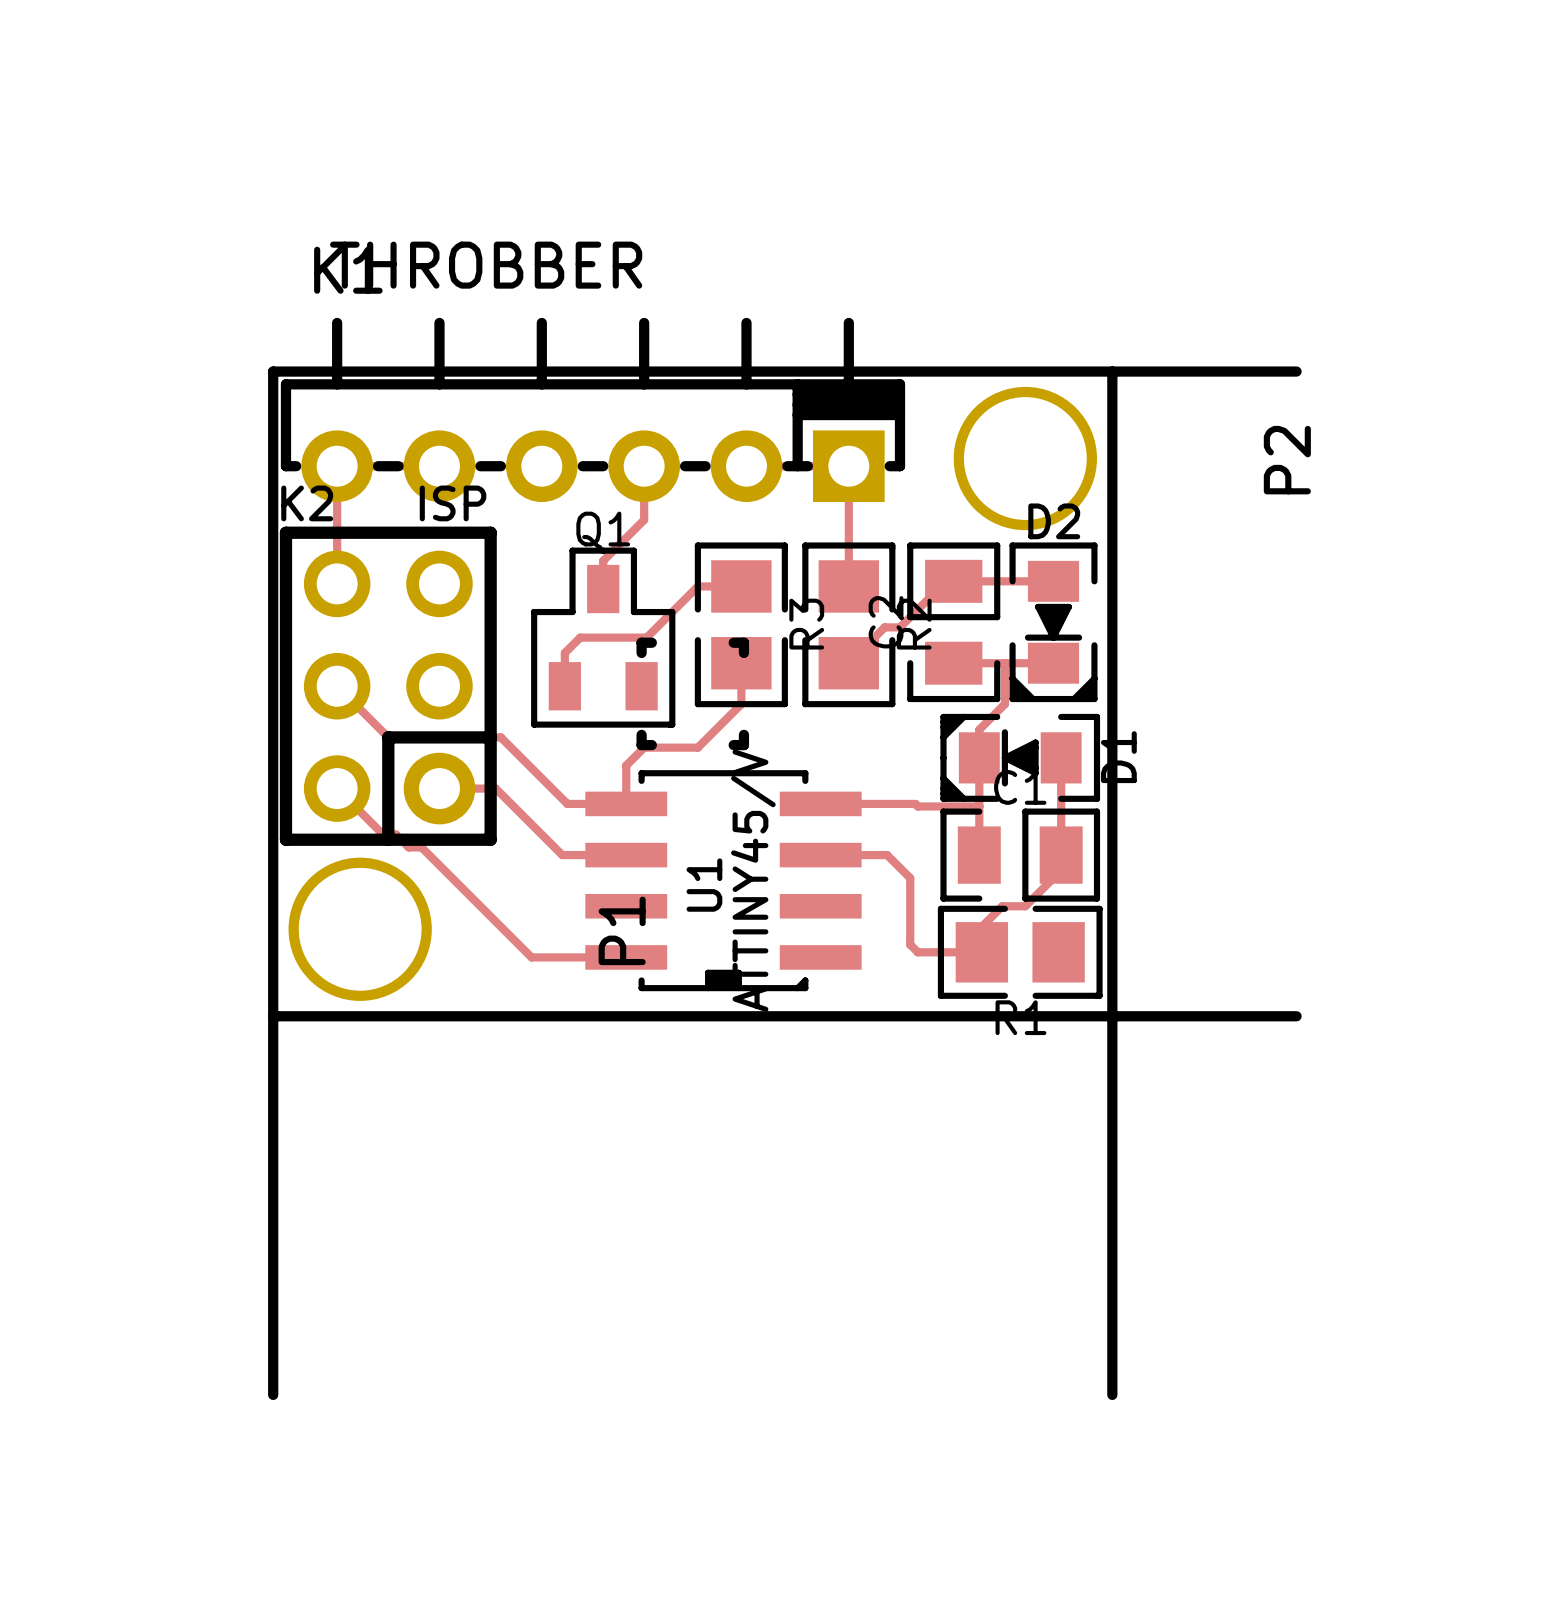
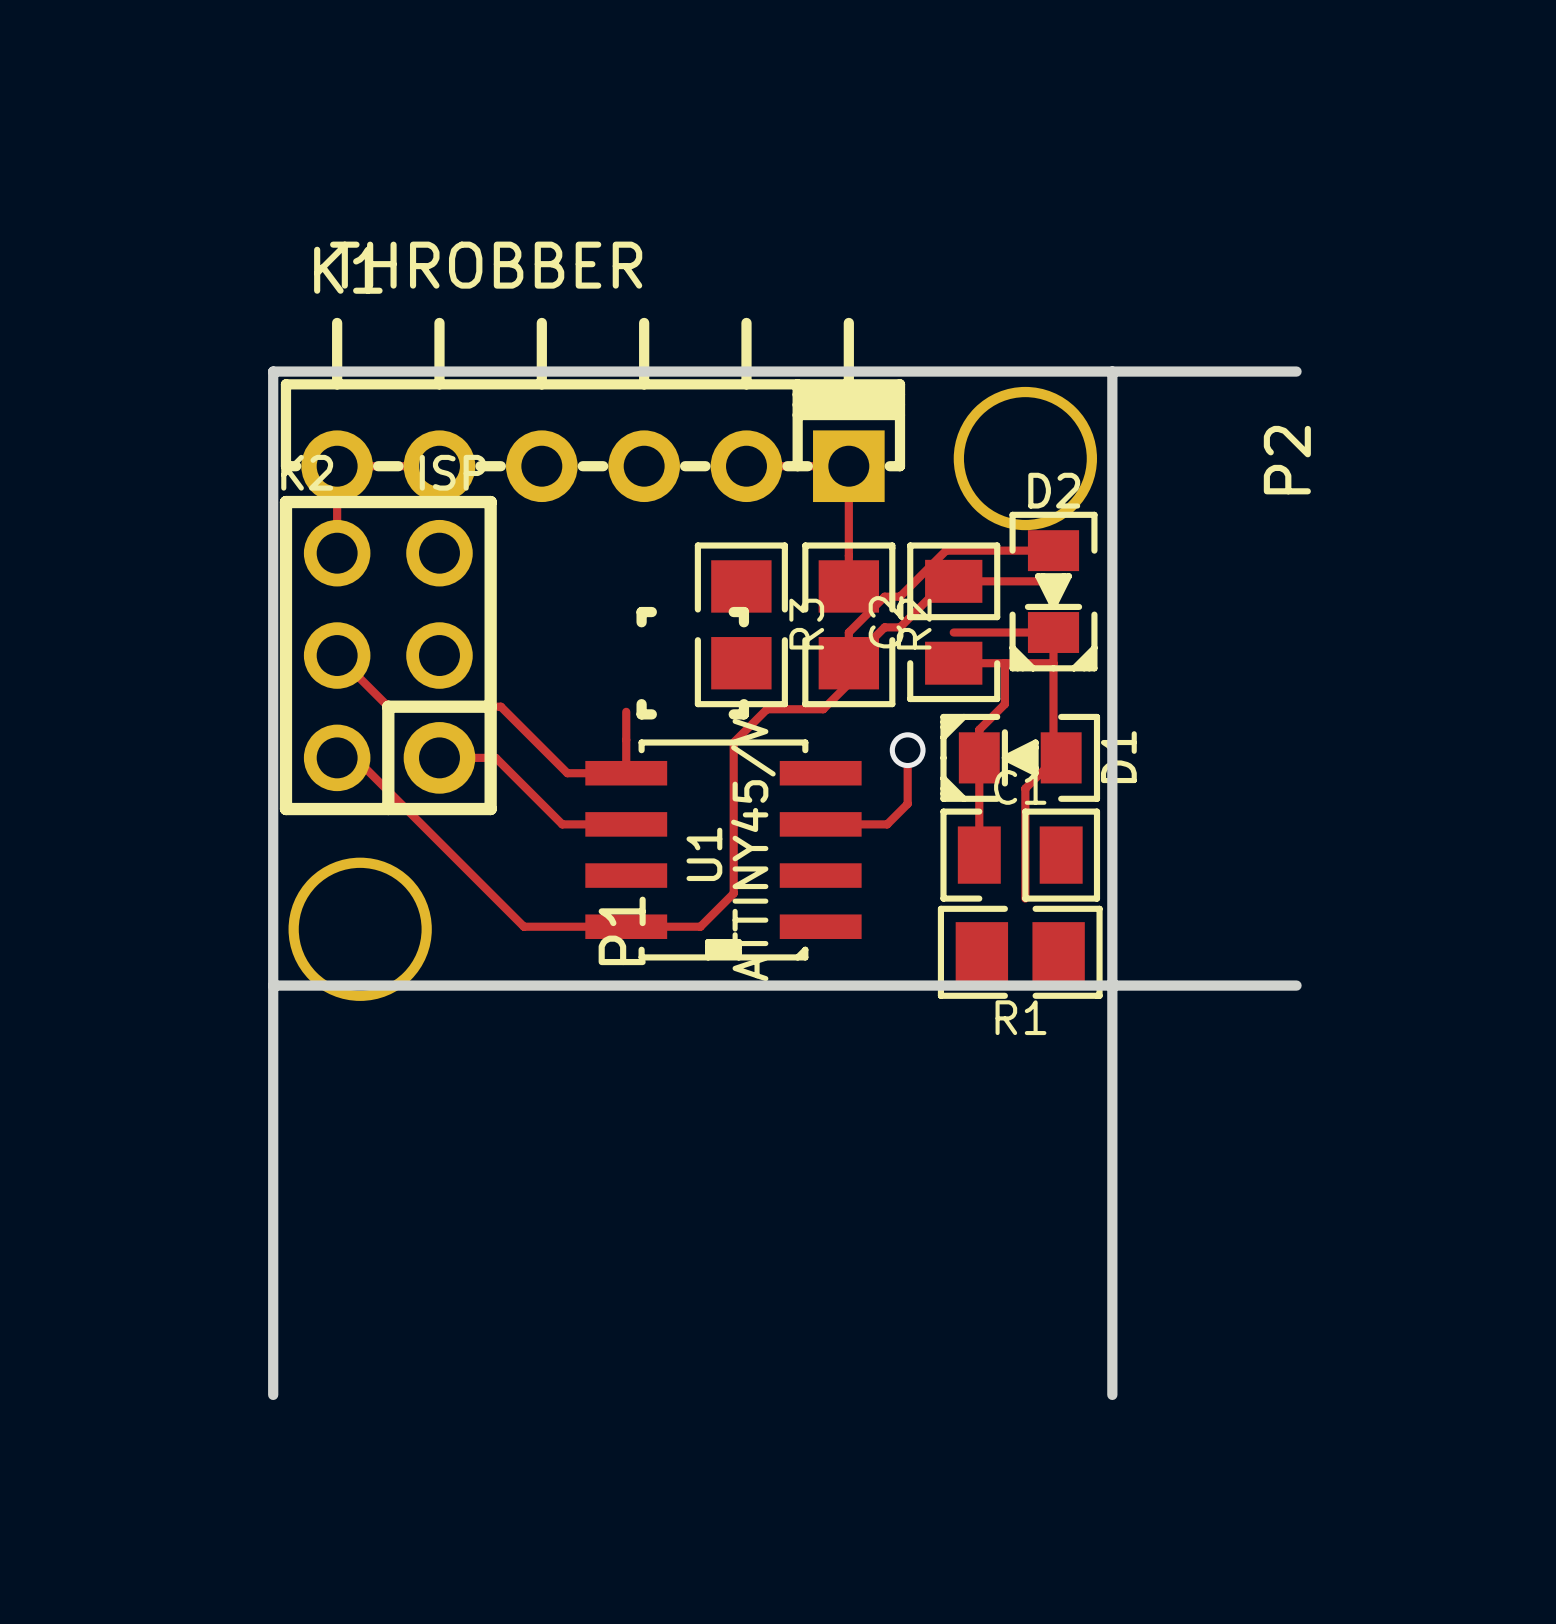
track: (644, 466) (644, 519) (603, 560) (603, 589) -> none
track: none -> (1053, 550) (946, 550) (900, 596) (884, 596) (848, 632) (848, 683) (823, 709) (766, 709) (733, 742) (733, 893) (700, 926) (523, 926) (355, 757) (337, 757)
track: (741, 586) (697, 586) (646, 637) (580, 637) (564, 652) (564, 686) -> none
D2 position: (1053, 622) -> (1053, 591)
track: none -> (953, 632) (1053, 632) (1053, 760) (1025, 788) (1025, 898)
Q1: (603, 637) -> none
track: (741, 663) (741, 704) (697, 747) (644, 747) (626, 765) -> (626, 711) (626, 765)
track: (337, 686) (388, 737) (500, 737) (567, 803) (626, 803) (626, 773) -> (337, 655) (388, 706) (500, 706) (567, 773) (626, 773)
K2 position: (388, 686) -> (388, 655)
drawing position: (692, 693) -> (692, 663)
track: none -> (907, 750) (907, 803) (887, 824) (820, 824)
via: none -> (907, 750)
track: (1061, 757) (1061, 870) (1025, 906) (1002, 906) (981, 926) (981, 952) (917, 952) (910, 944) (910, 878) (887, 855) (820, 855) -> none
track: (337, 788) (383, 834) (395, 834) (408, 847) (421, 847) (531, 957) (626, 957) -> none
track: (439, 788) (495, 788) (562, 855) (626, 855) -> (439, 757) (495, 757) (562, 824) (626, 824)
track: (820, 803) (915, 803) (917, 806) (979, 806) -> none
U1 position: (723, 880) -> (723, 849)
board edge: (273, 1016) (1296, 1016) -> (273, 985) (1296, 985)

